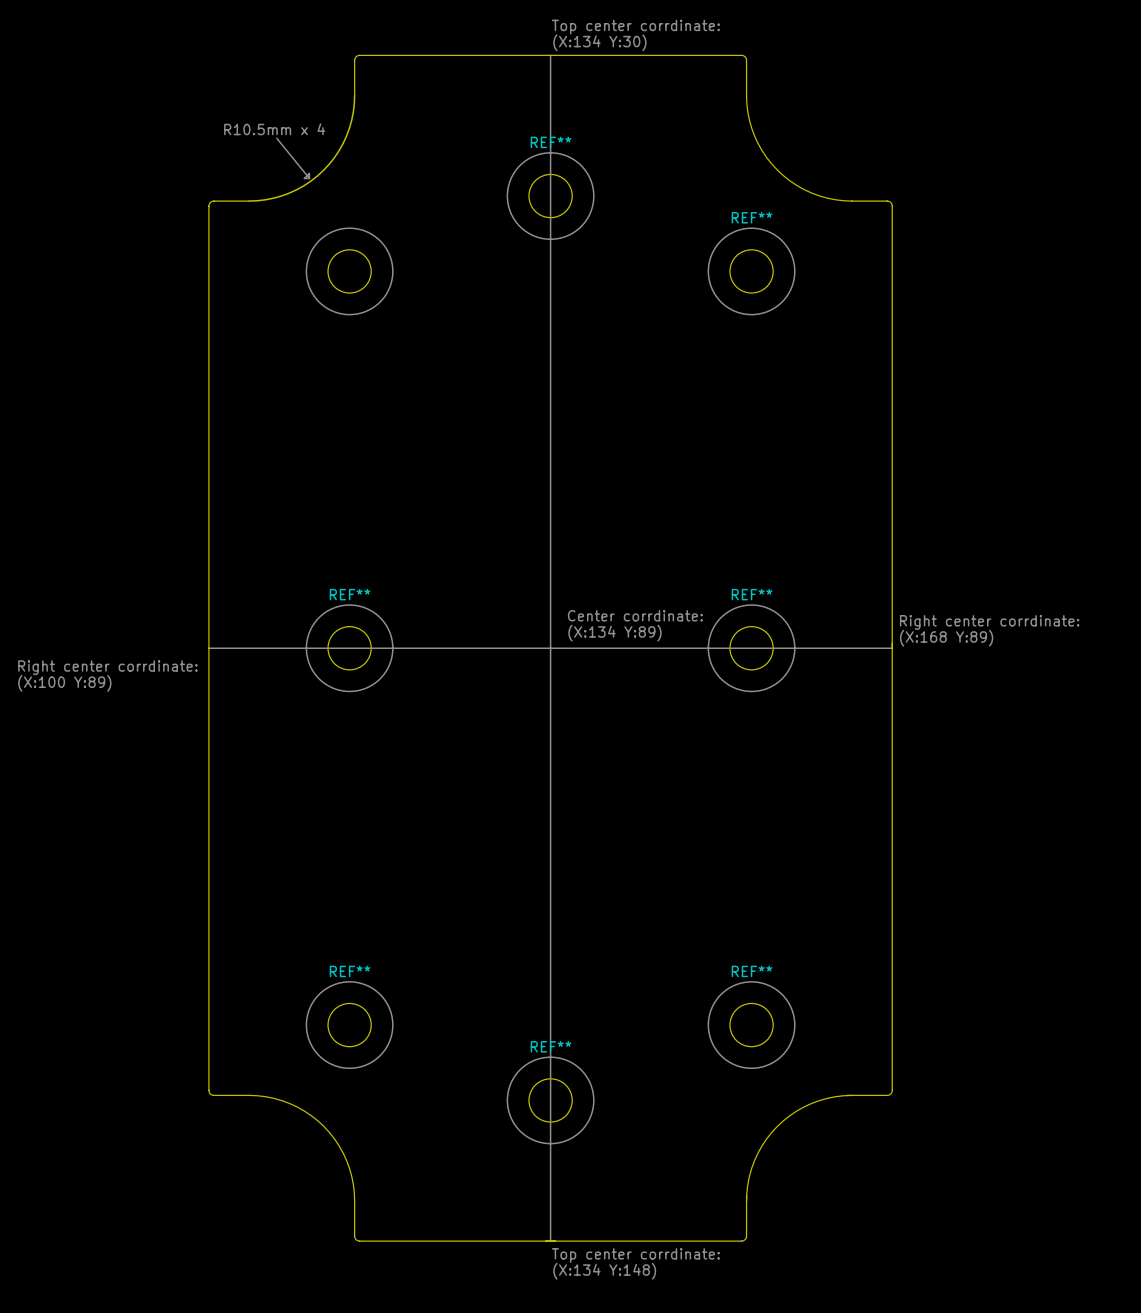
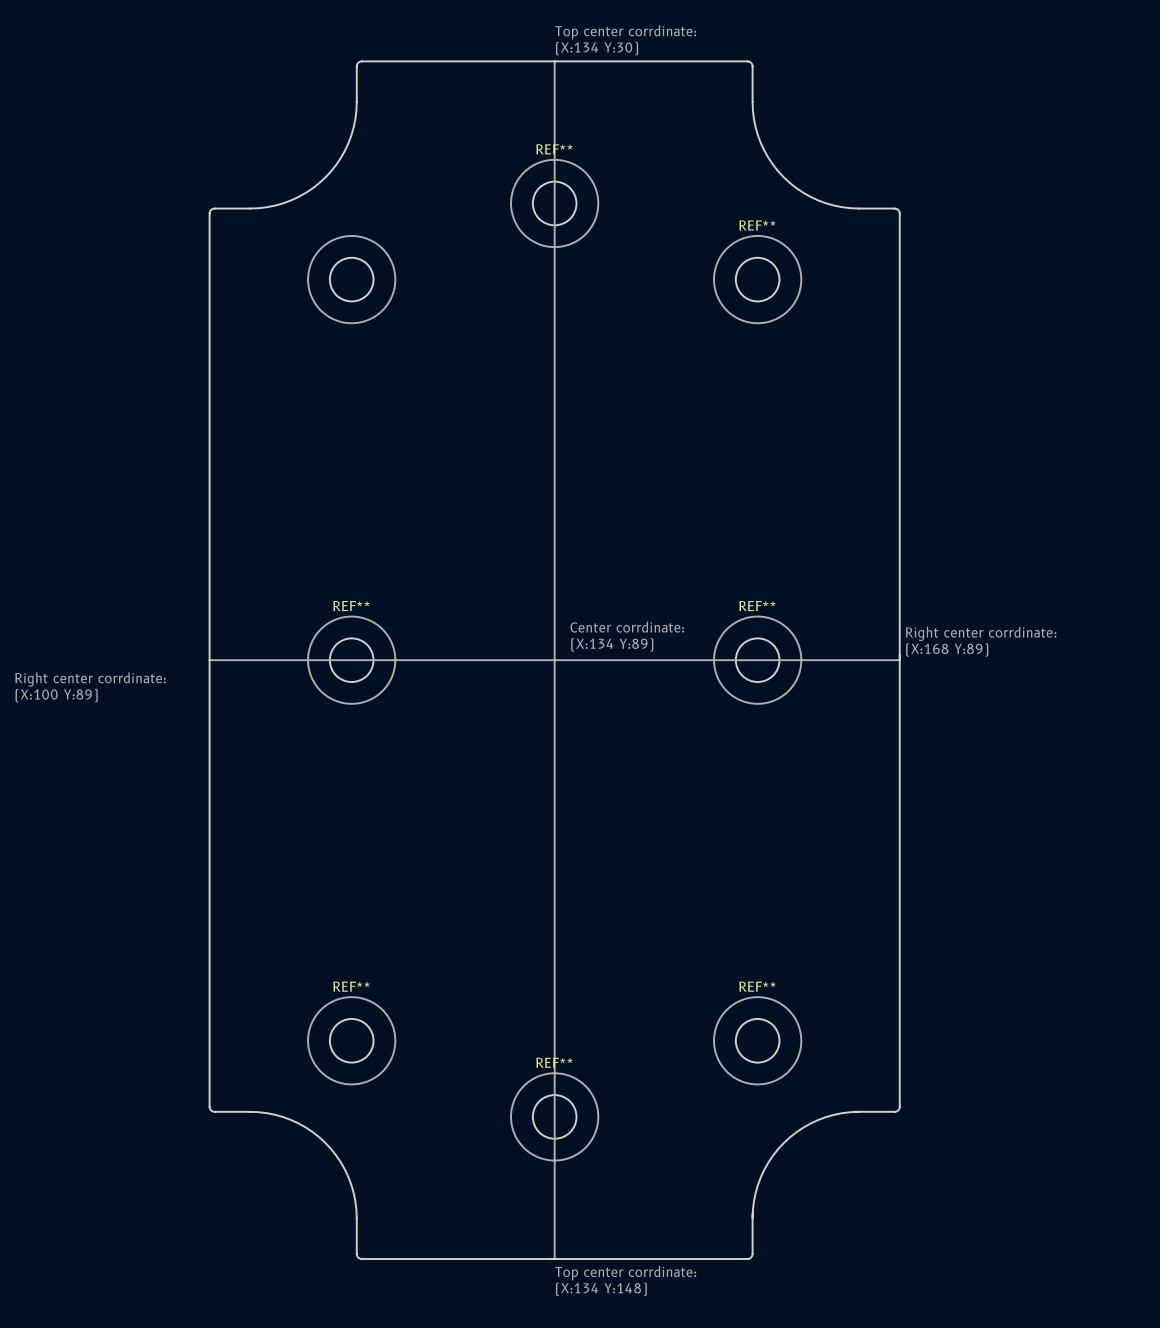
text: R10.5mm x 4 (274, 129) -> none
line: (276, 138) (309, 178) -> none
line: (309, 178) (309, 173) (304, 178) (309, 178) -> none

